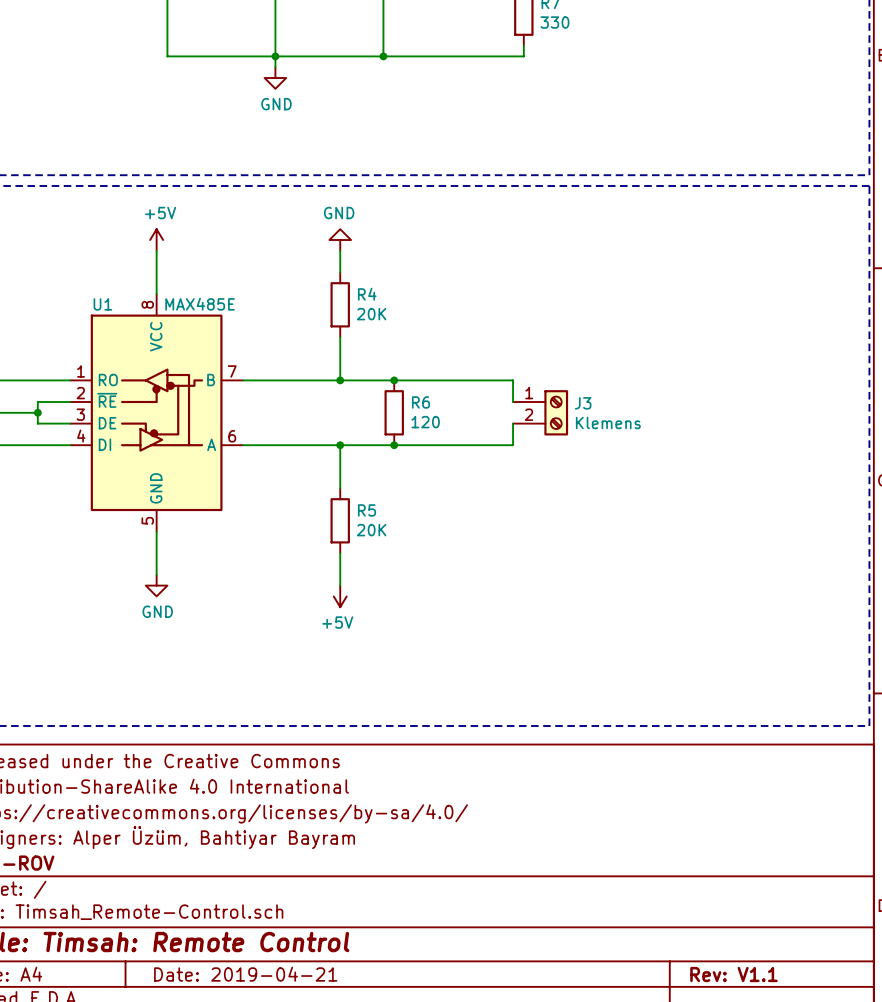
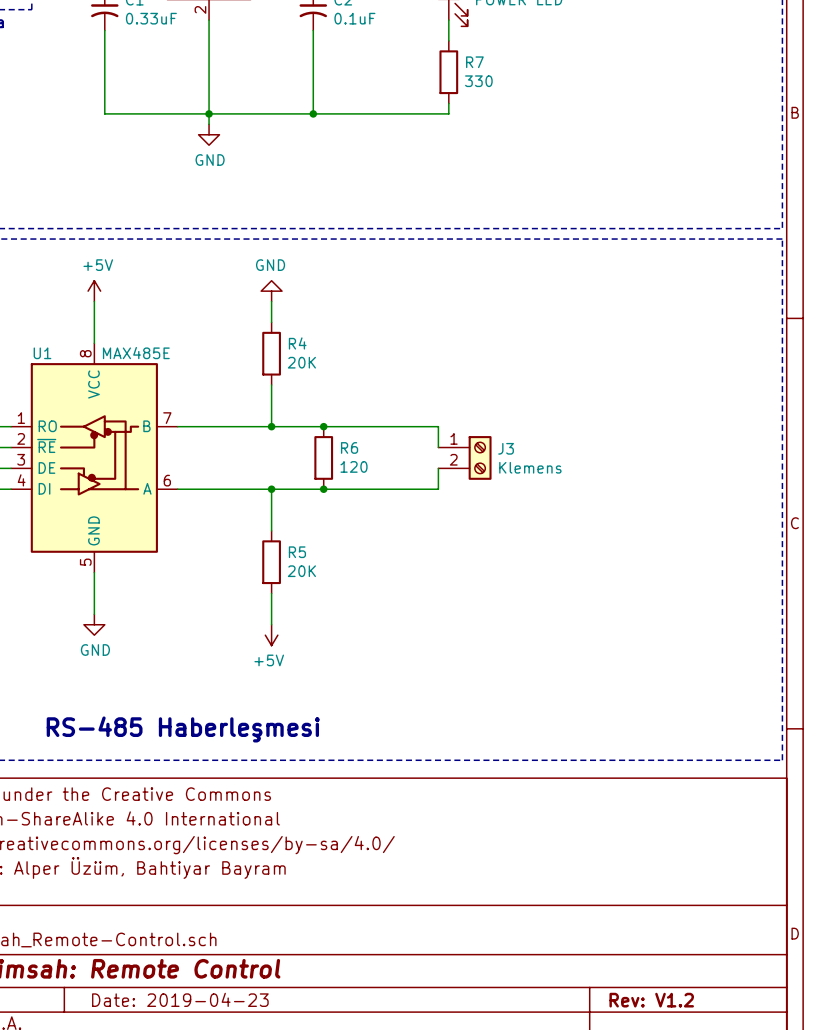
text: none -> RS-485 Haberleşmesi (183, 729)
title block: Date: 2019-04-21 (245, 974) -> Date: 2019-04-23 (180, 999)
title block: Rev: V1.1 (734, 974) -> Rev: V1.2 (651, 1000)

